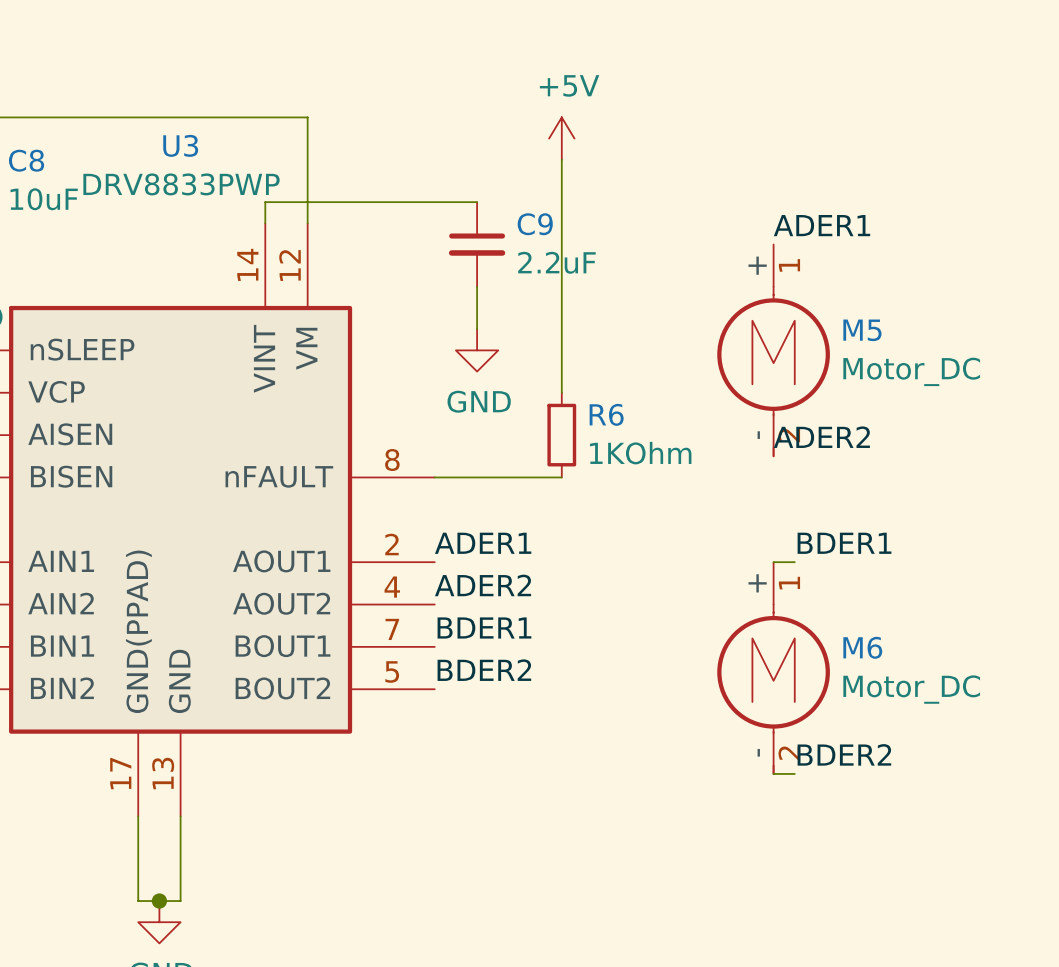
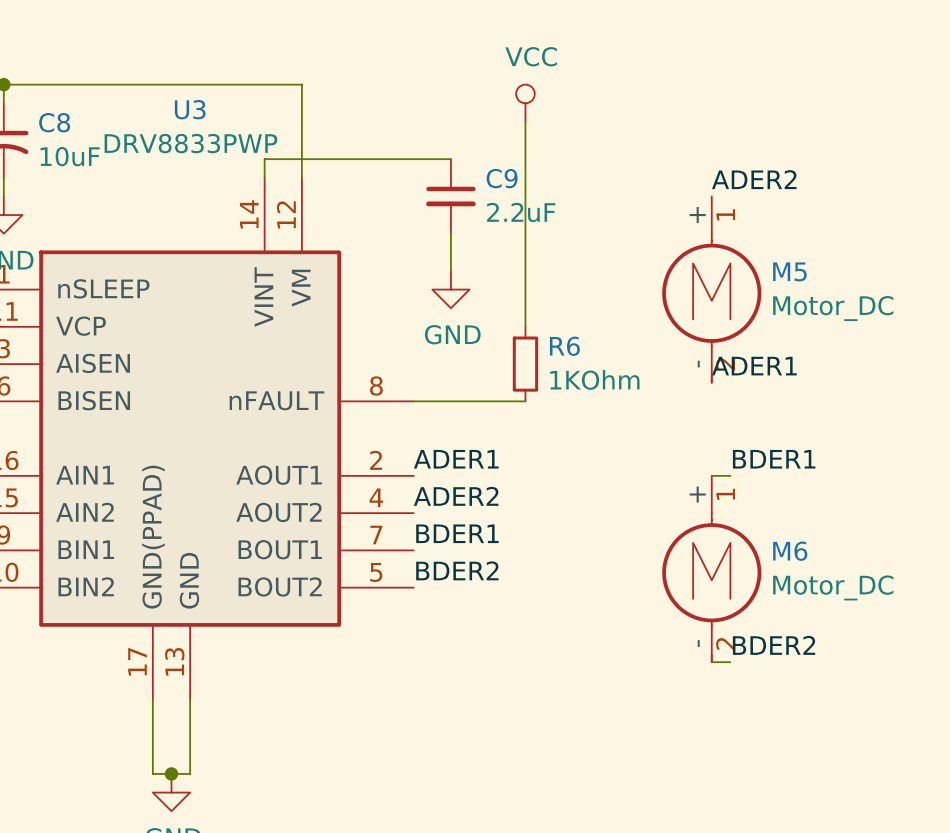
power symbol: +5V (561, 138) -> VCC (525, 103)
label: ADER1 (821, 225) -> ADER2 (754, 179)
label: ADER2 (821, 437) -> ADER1 (754, 366)

